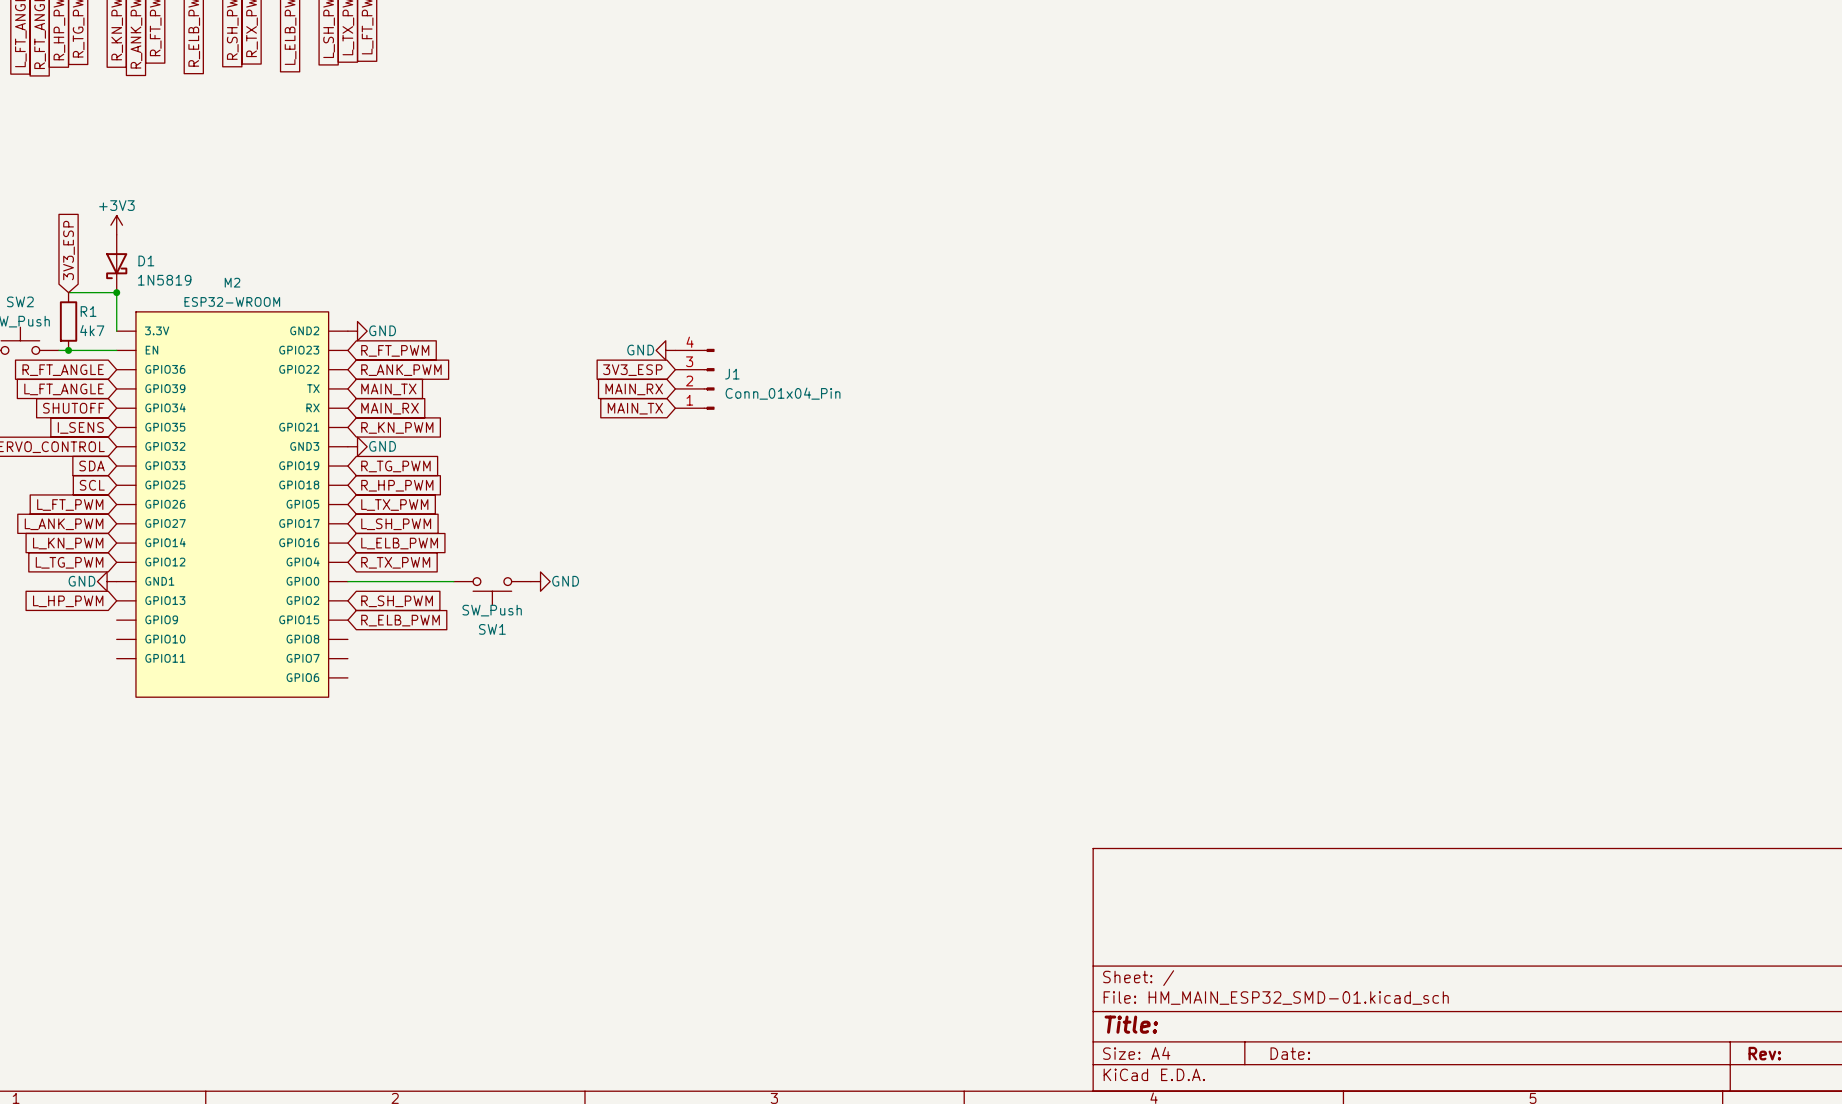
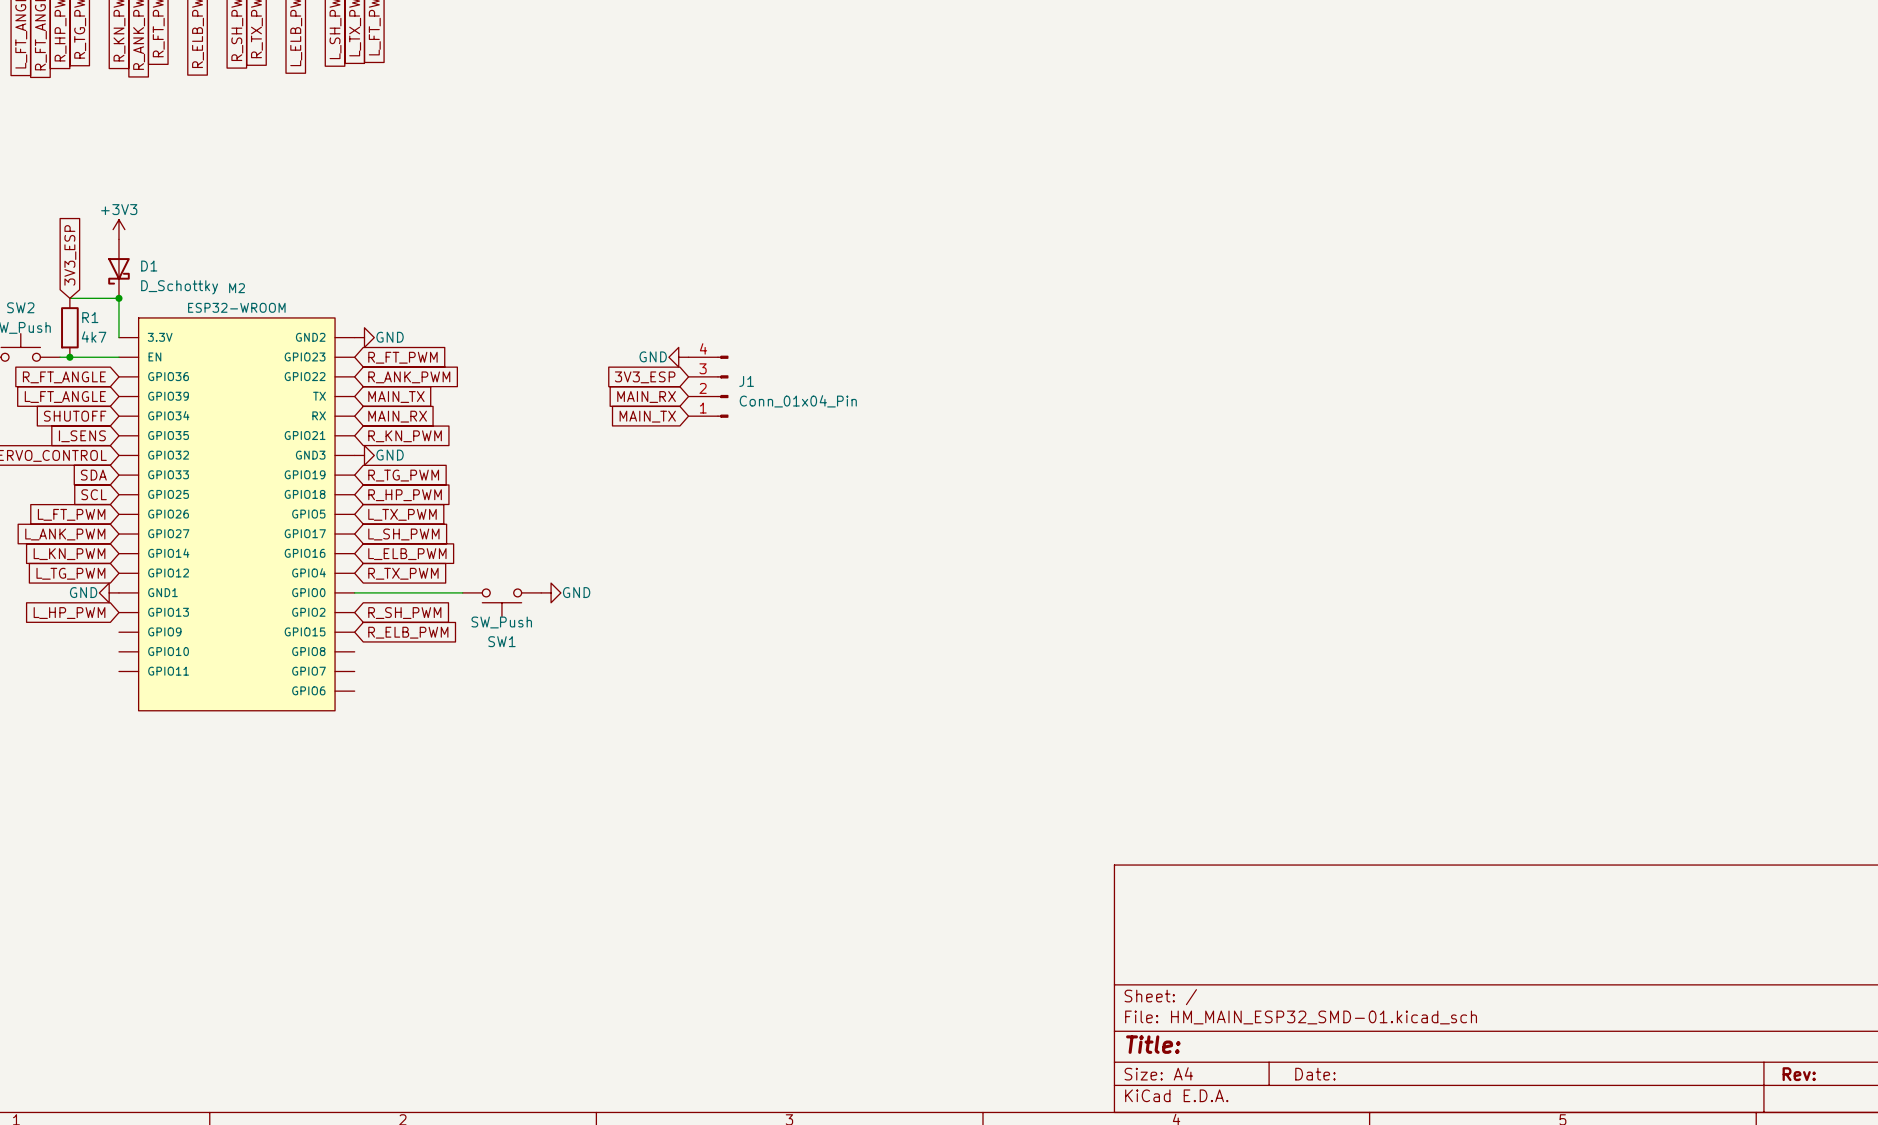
D1 value: 1N5819 (164, 280) -> D_Schottky (179, 287)

